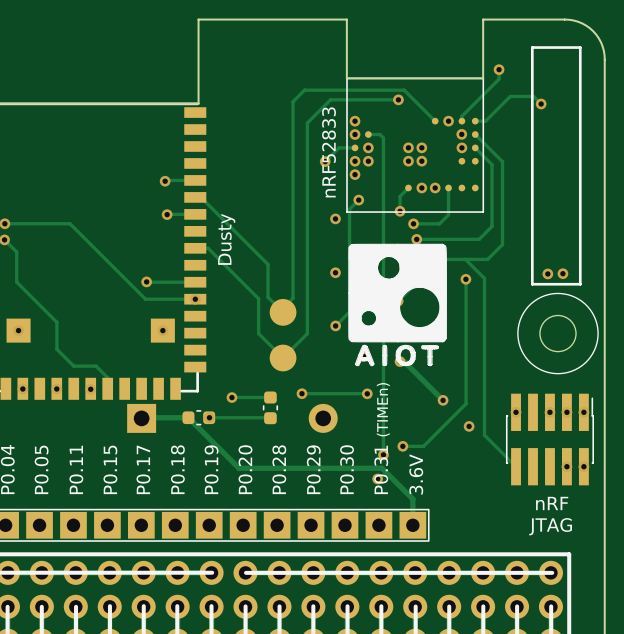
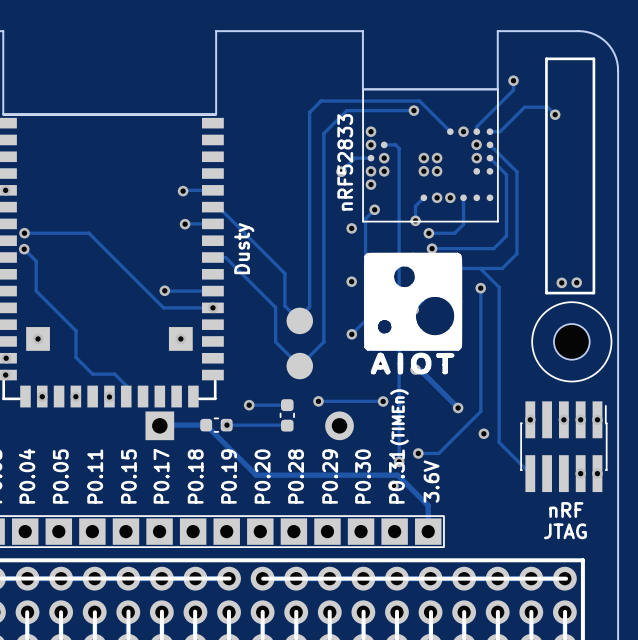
round board edge: [539, 314, 577, 353] -> none
part: none -> (571, 341)

